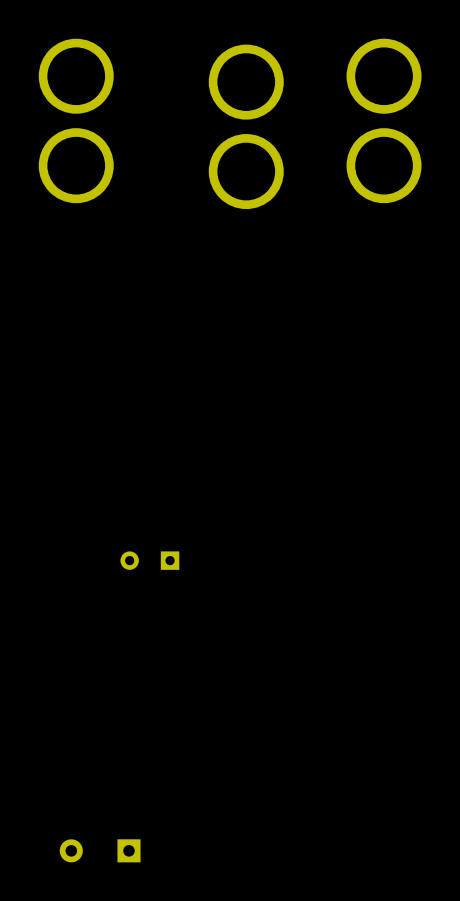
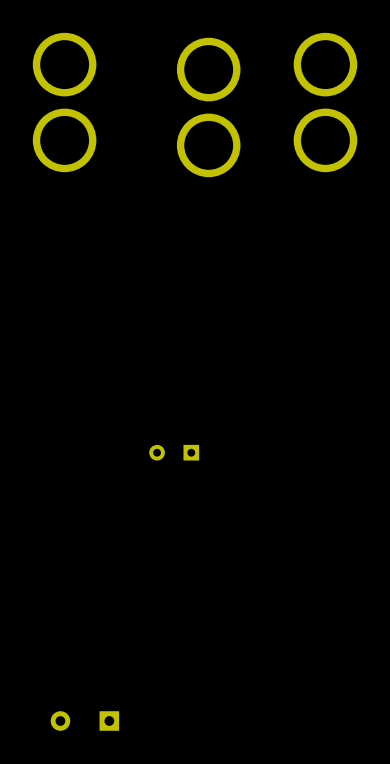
part position: (149, 560) -> (174, 452)

